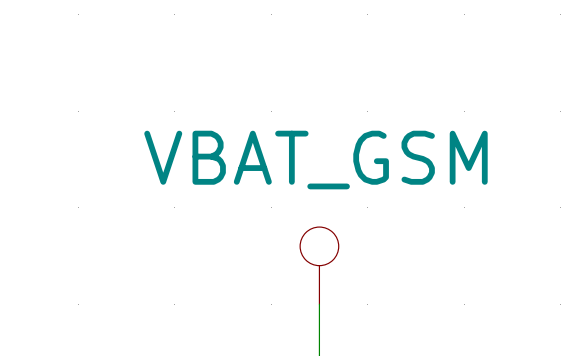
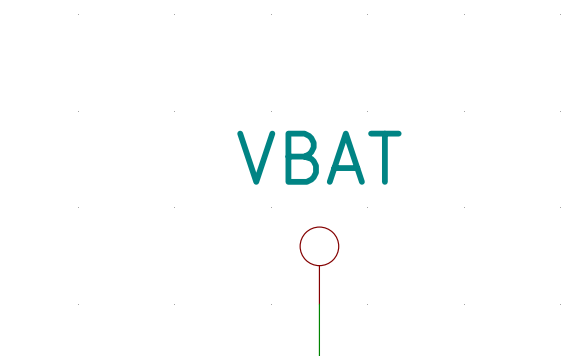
power symbol: VBAT_GSM (319, 265) -> VBAT (319, 265)

